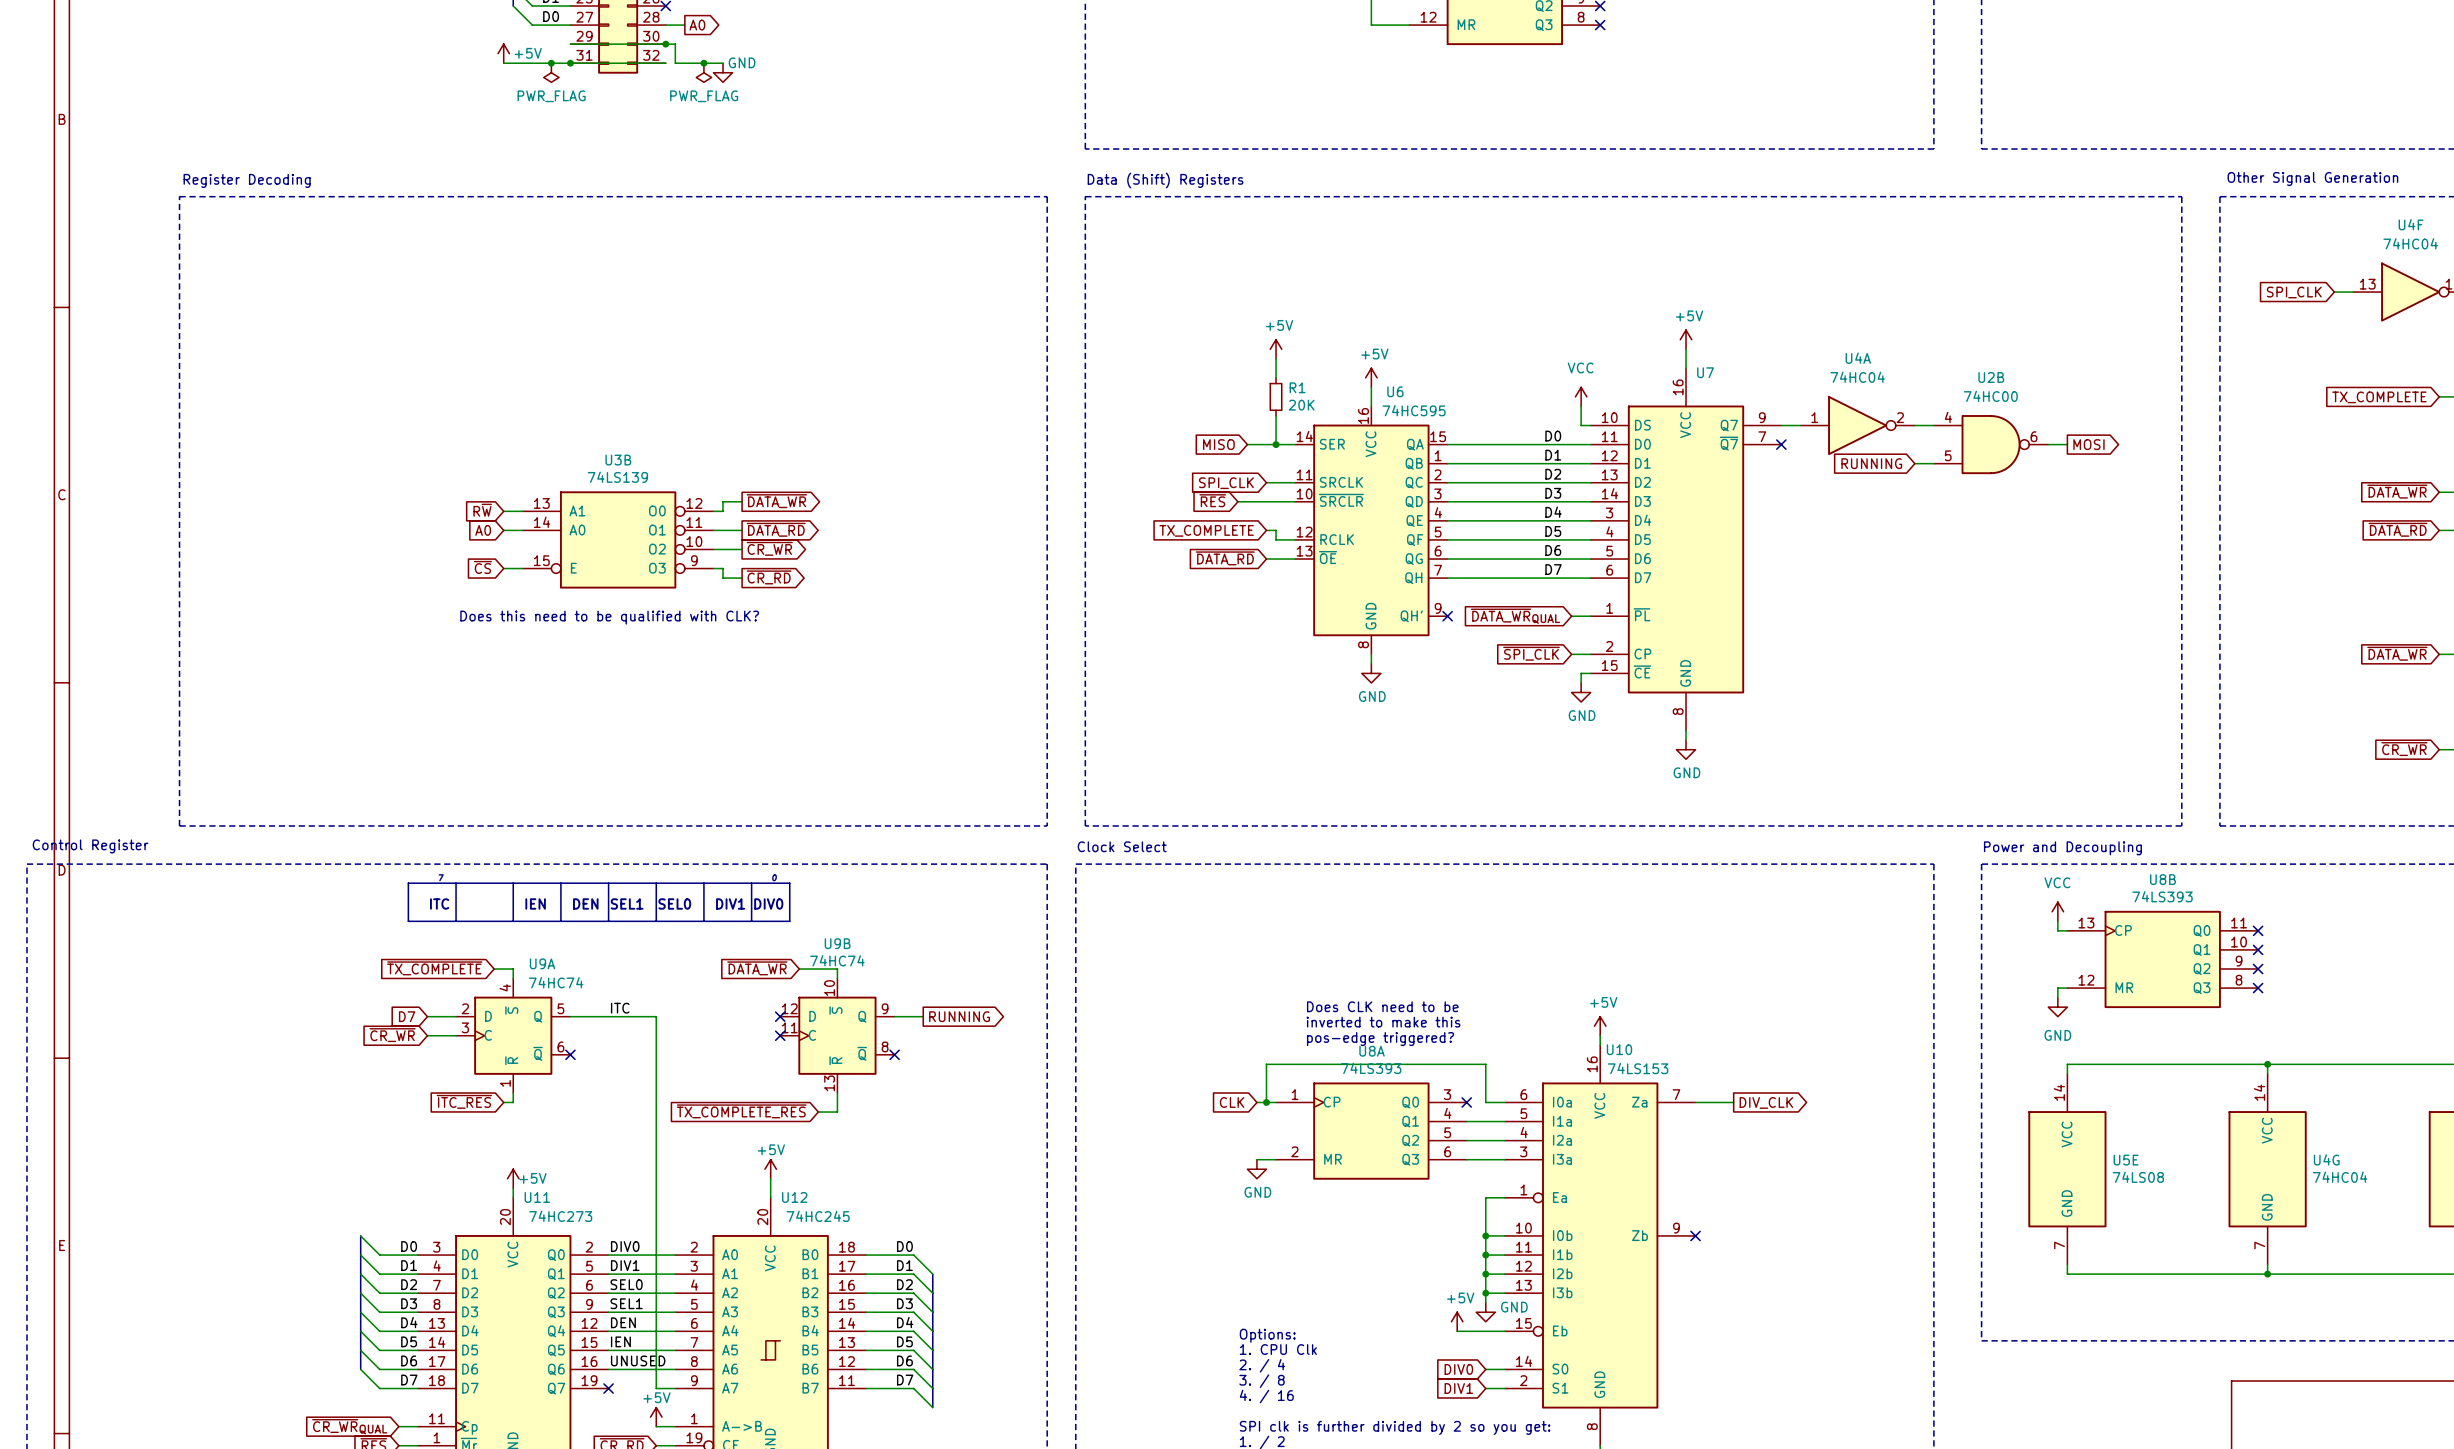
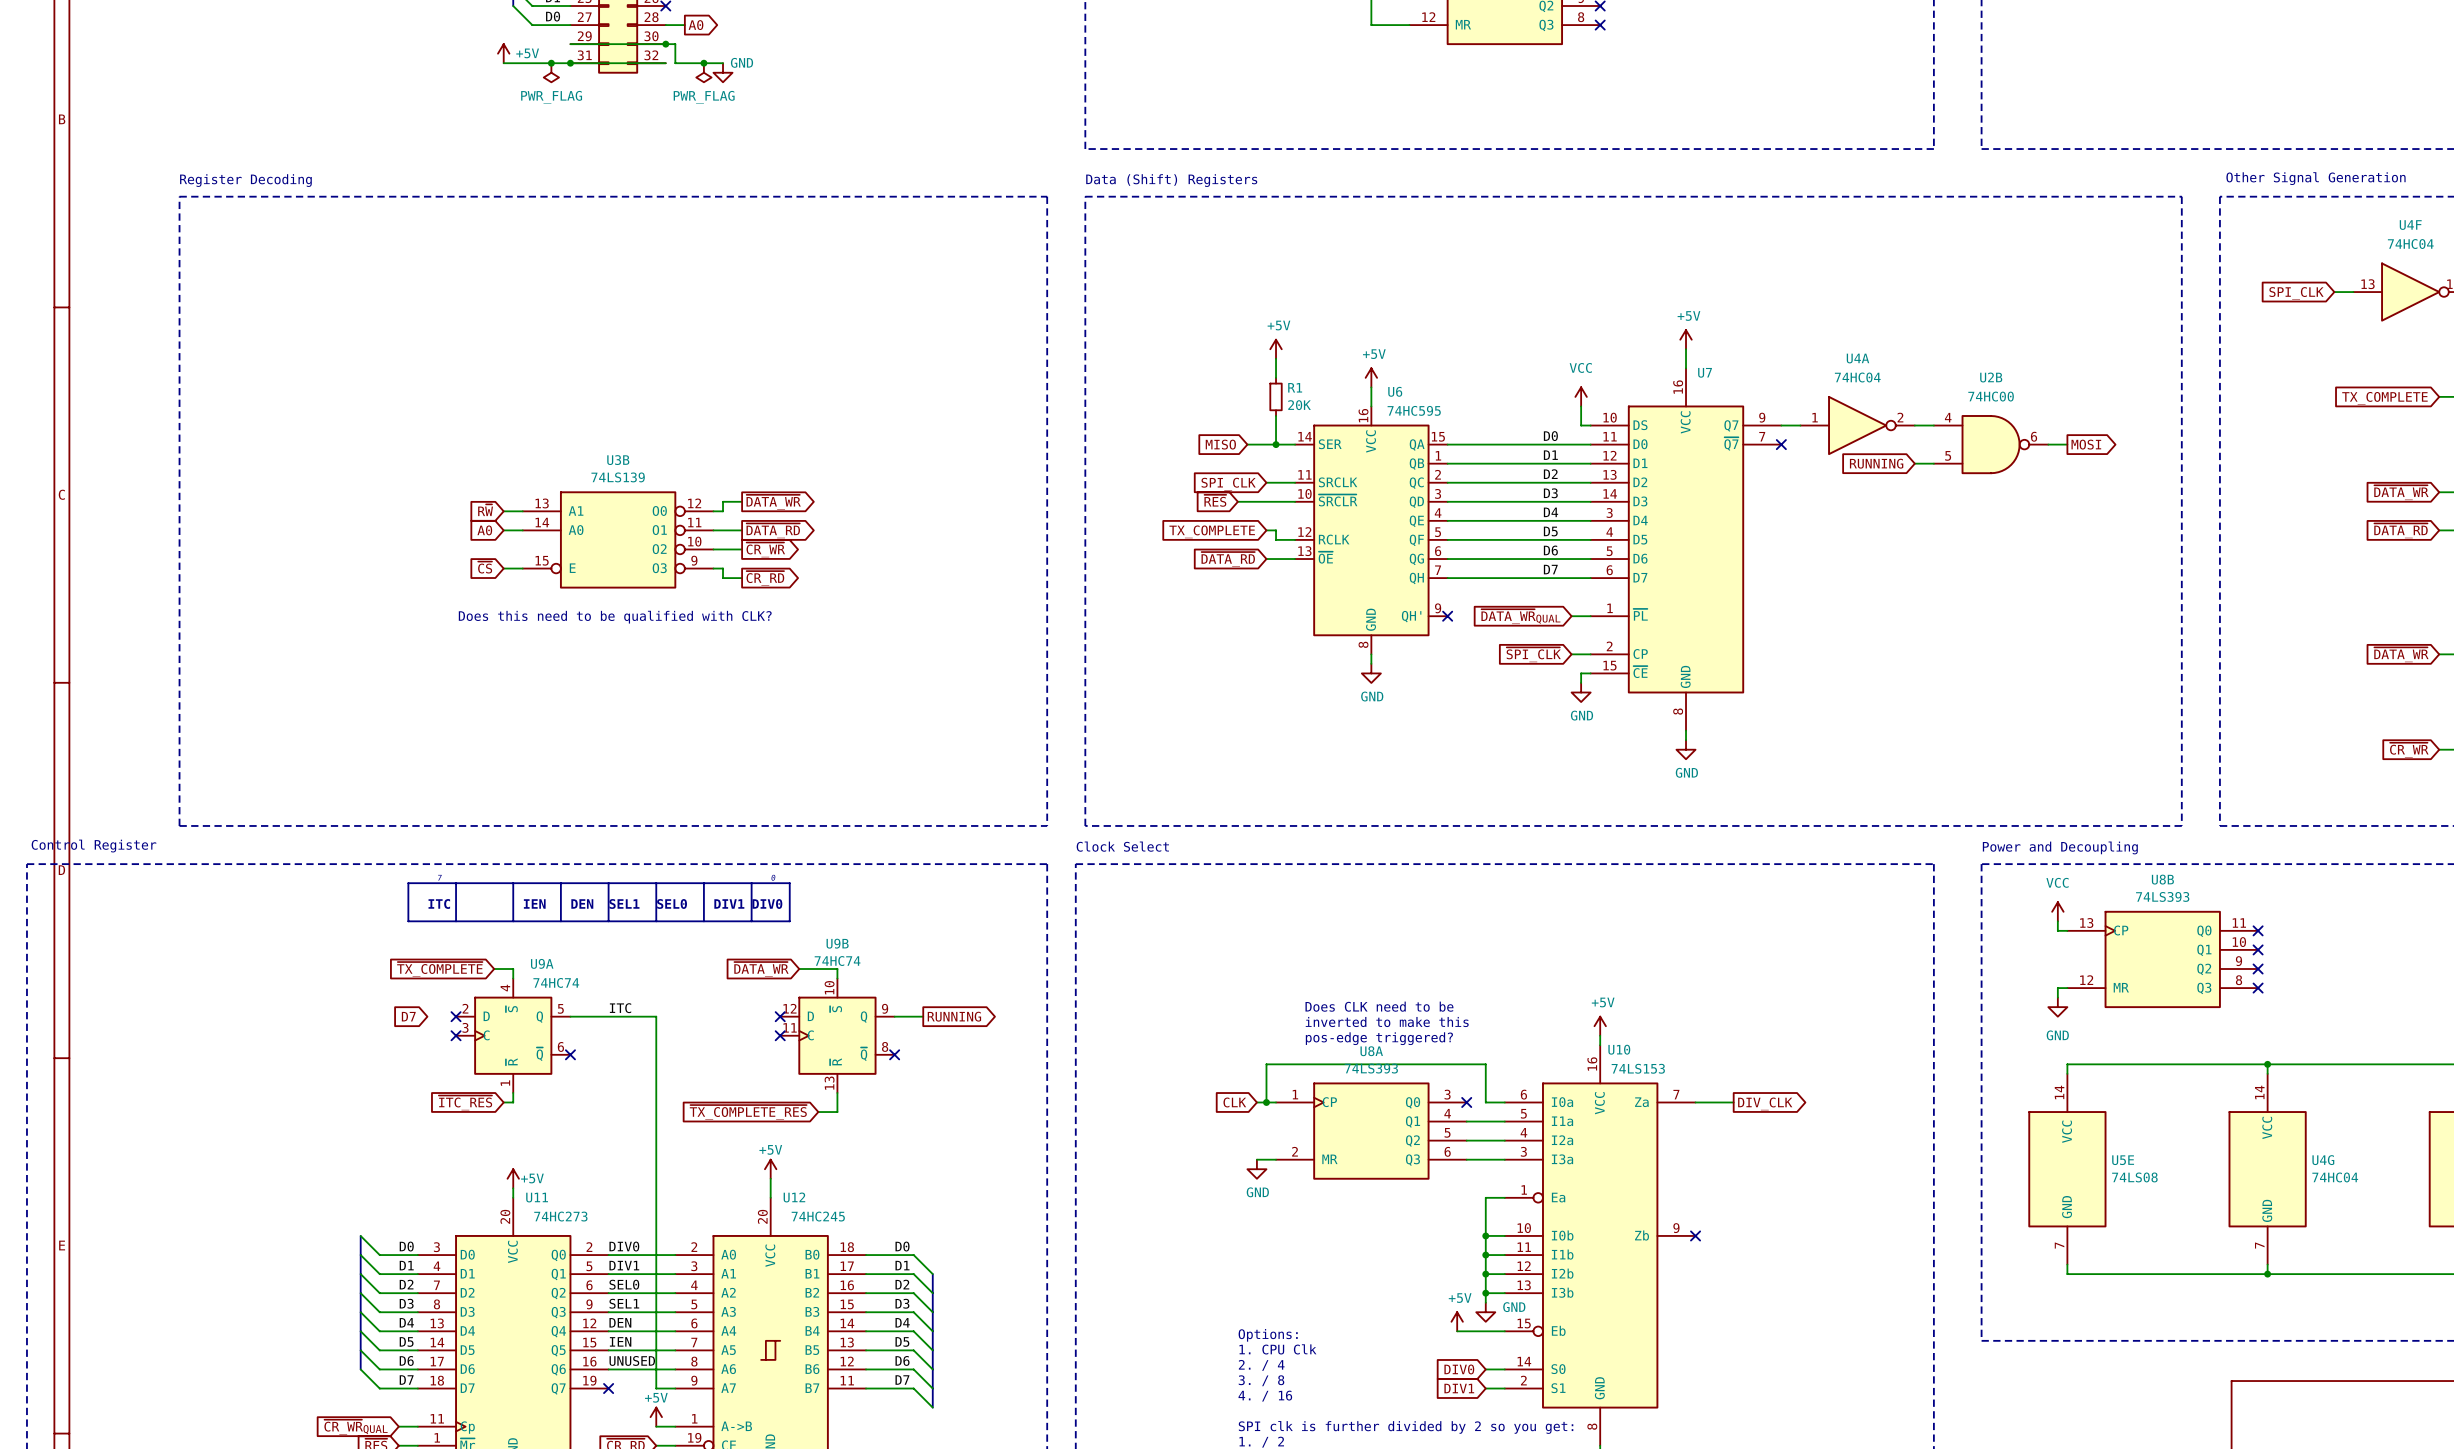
wire: (427, 1016) (456, 1016) -> none
no-connect mark: none -> (456, 1016)
global label: ~{CR_WR} (392, 1035) -> none
wire: (427, 1035) (456, 1035) -> none
no-connect mark: none -> (456, 1035)

